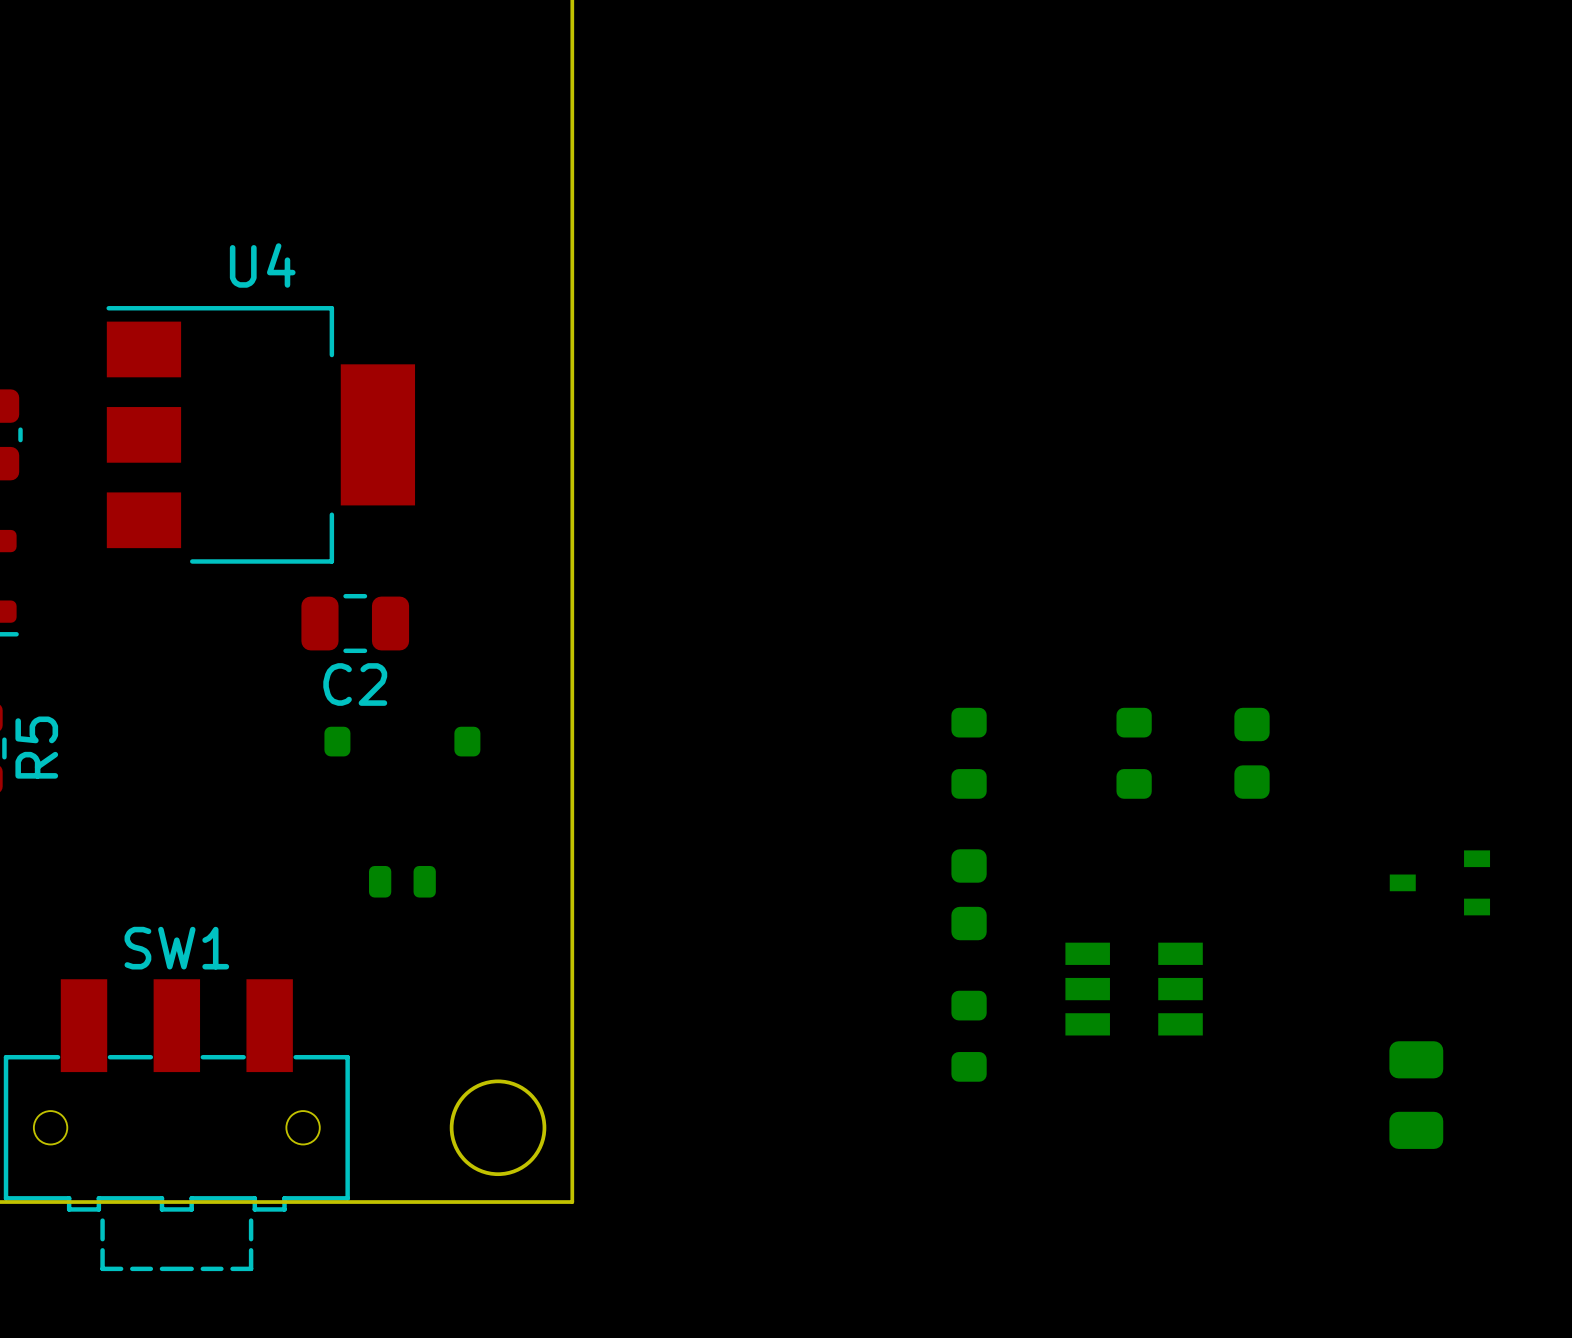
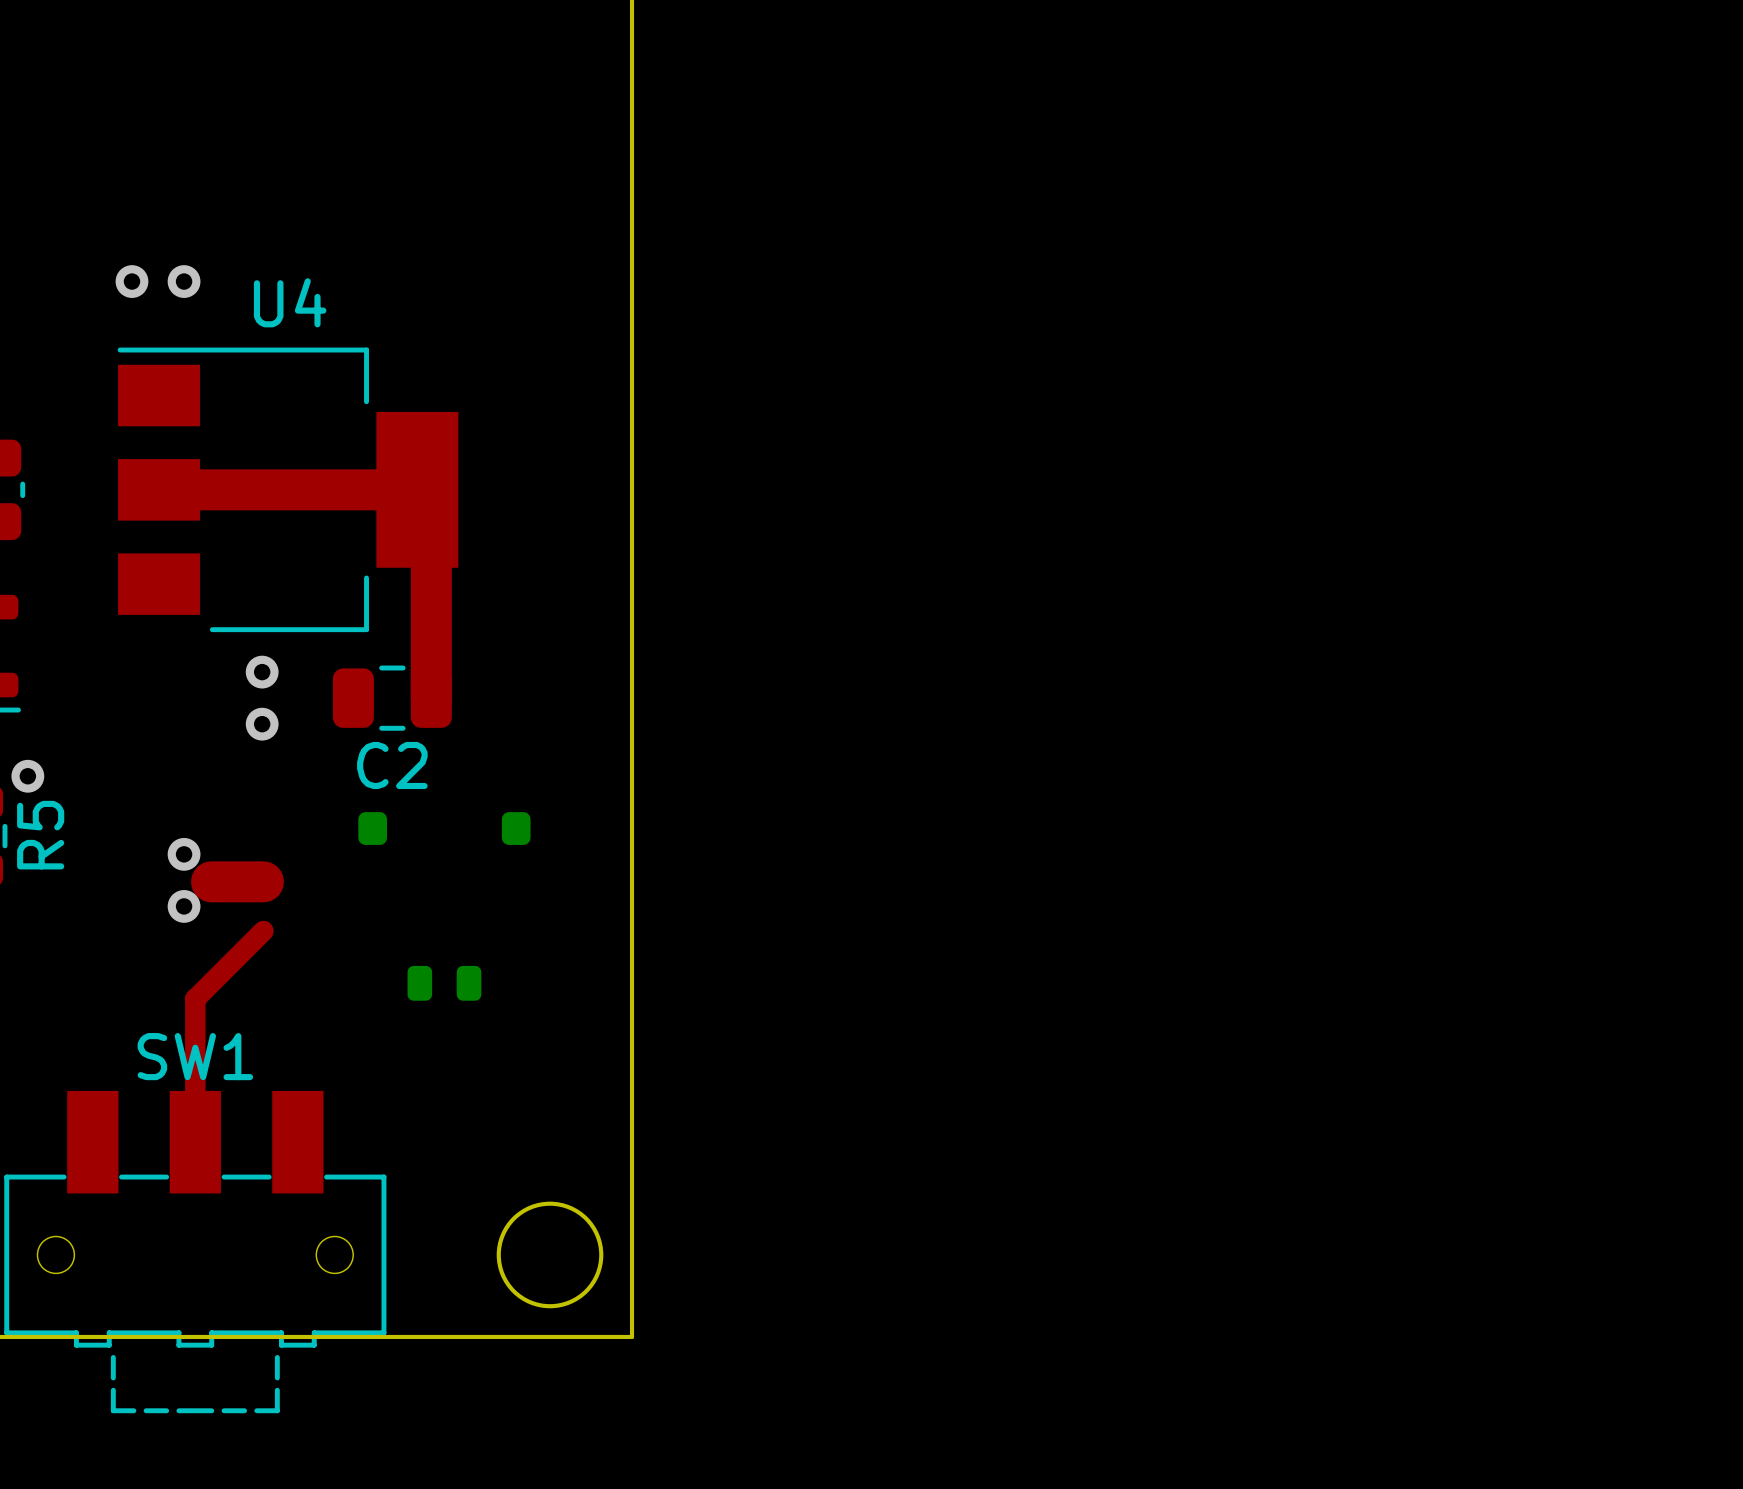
via: none -> (131, 281)
via: none -> (184, 281)
top track: none -> (159, 489) (417, 489) (431, 503) (431, 698)
via: none -> (262, 672)
via: none -> (262, 724)
via: none -> (27, 776)
part: (969, 753) -> none
part: (1134, 753) -> none
part: (1252, 753) -> none
via: none -> (184, 854)
top track: none -> (211, 881) (263, 881)
via: none -> (184, 906)
top track: none -> (263, 931) (195, 999) (195, 1142)
part: (1439, 882) -> none
part: (969, 894) -> none
part: (1134, 989) -> none
part: (969, 1036) -> none
part: (1416, 1095) -> none

